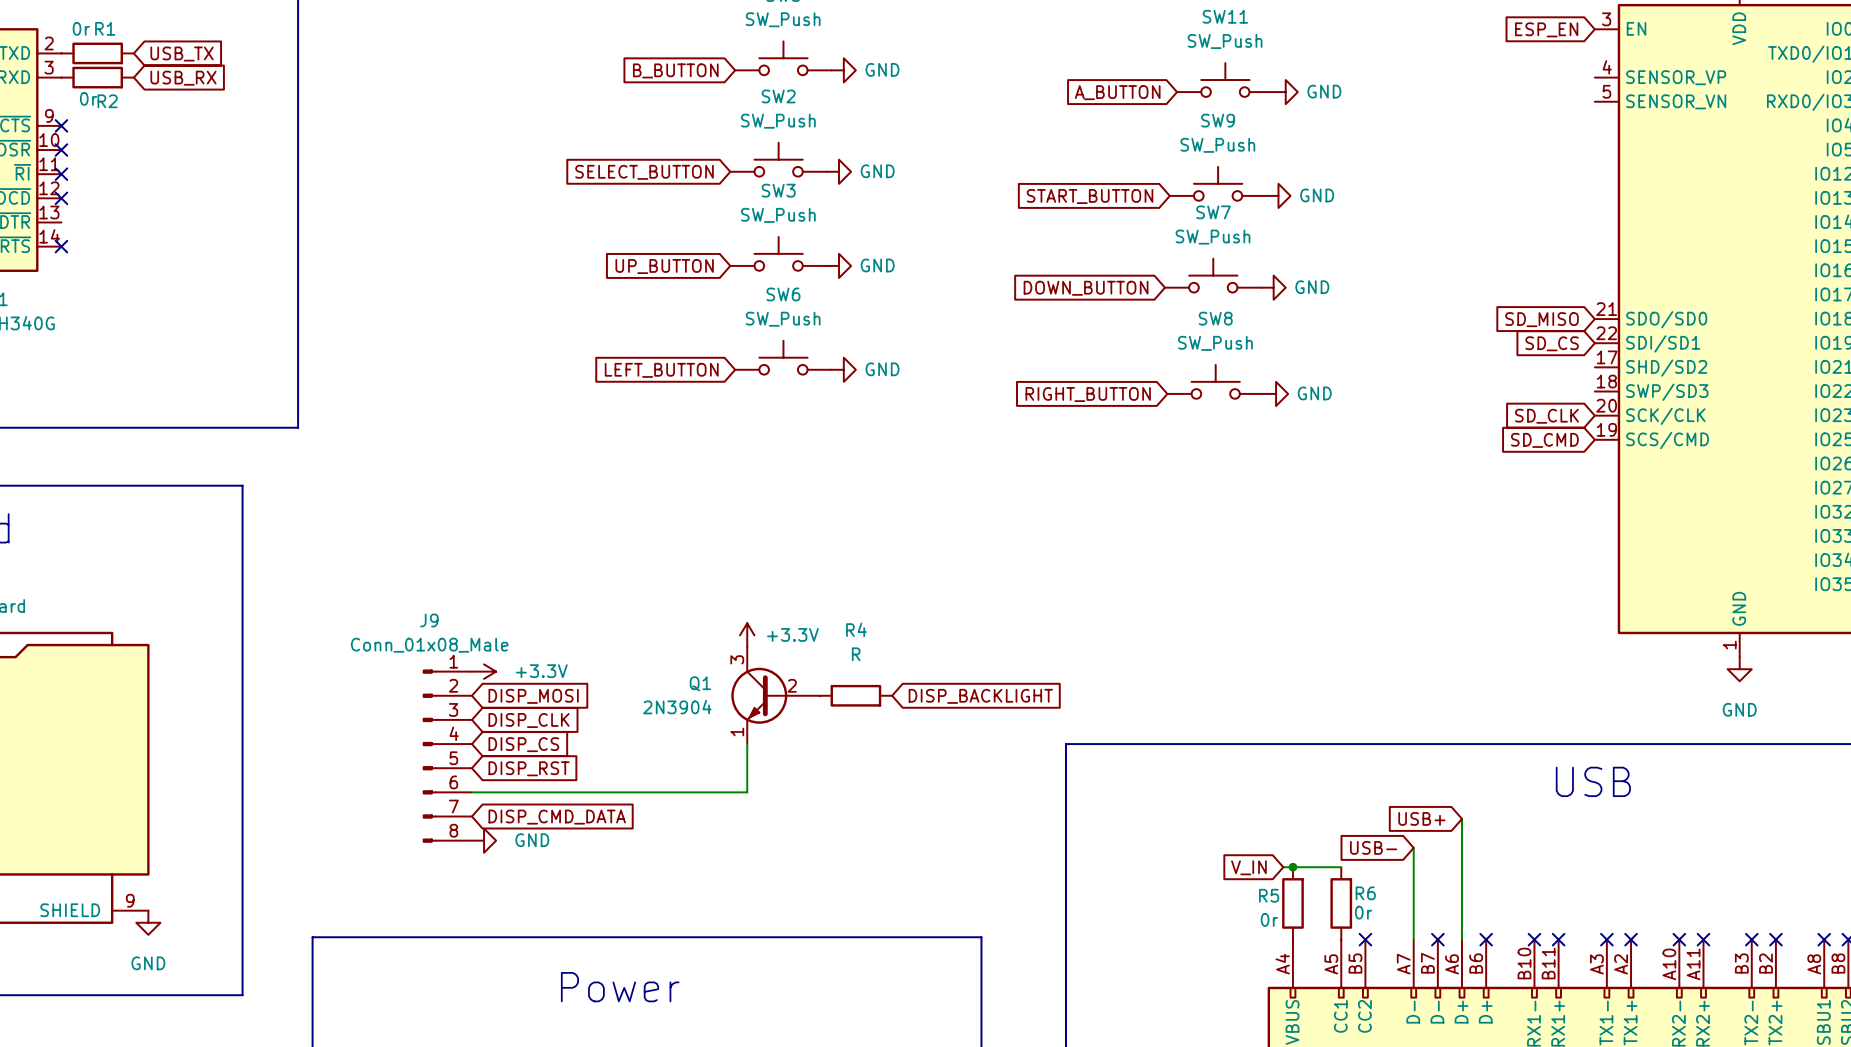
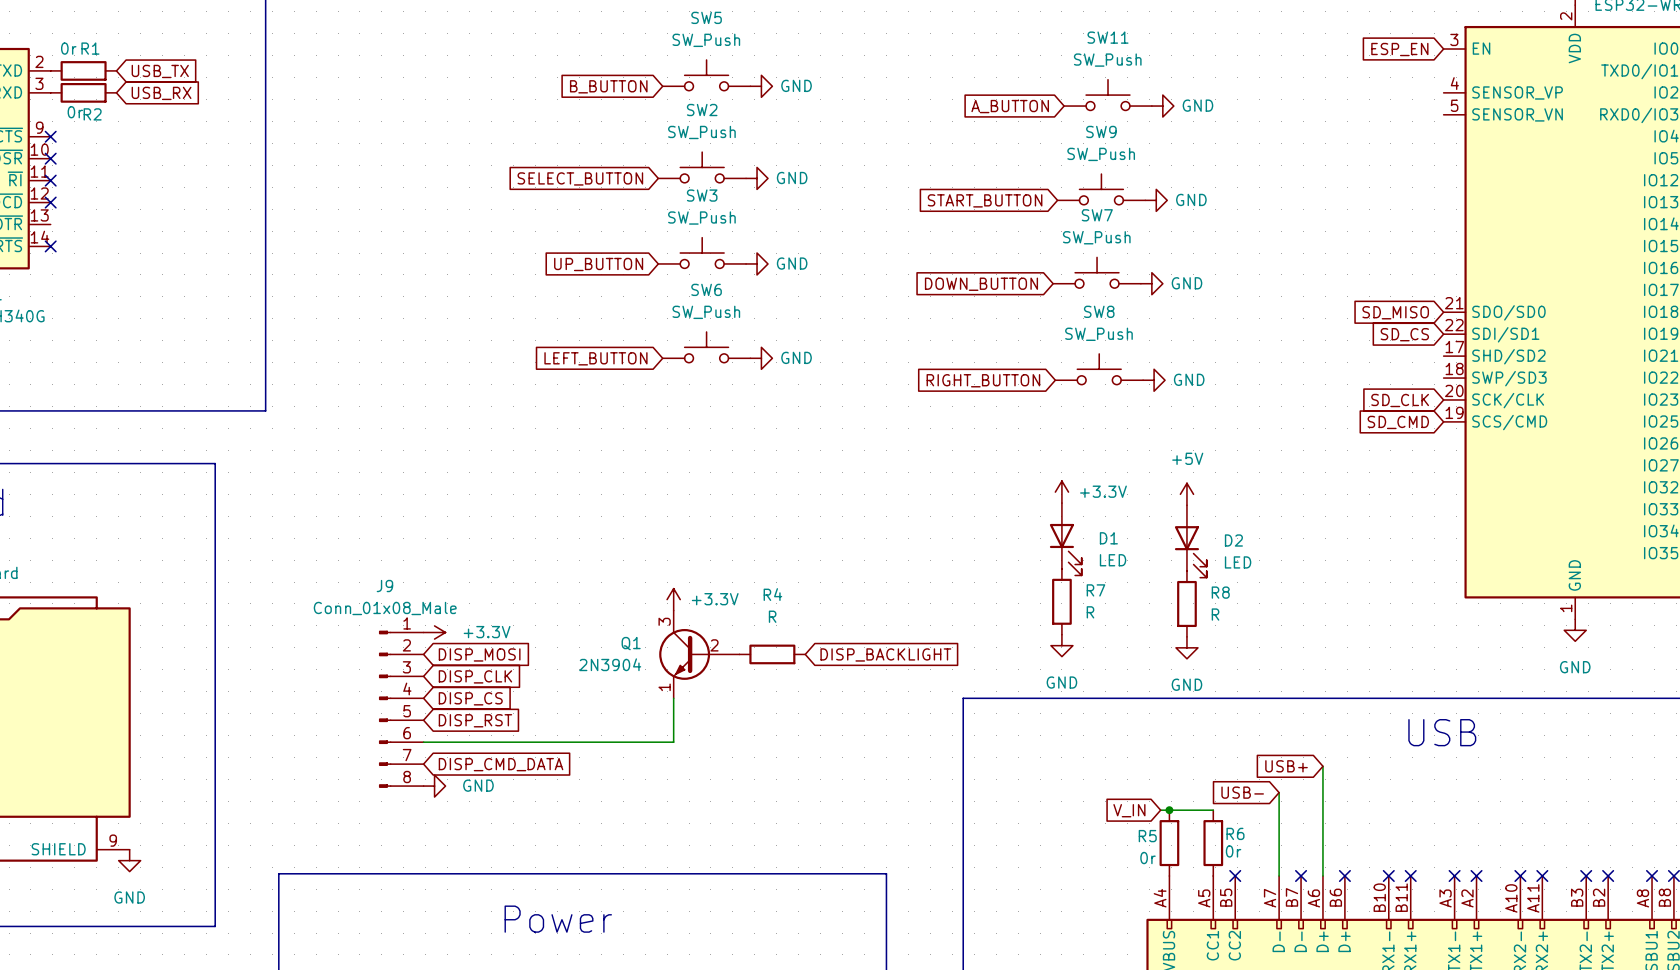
power symbol: none -> +3.3V (1061, 492)
power symbol: none -> +5V (1186, 494)
D1: none -> LED (1065, 539)
D2: none -> LED (1190, 541)
R7: none -> R (1061, 601)
R8: none -> R (1186, 603)
power symbol: none -> GND (1061, 645)
power symbol: none -> GND (1186, 647)

